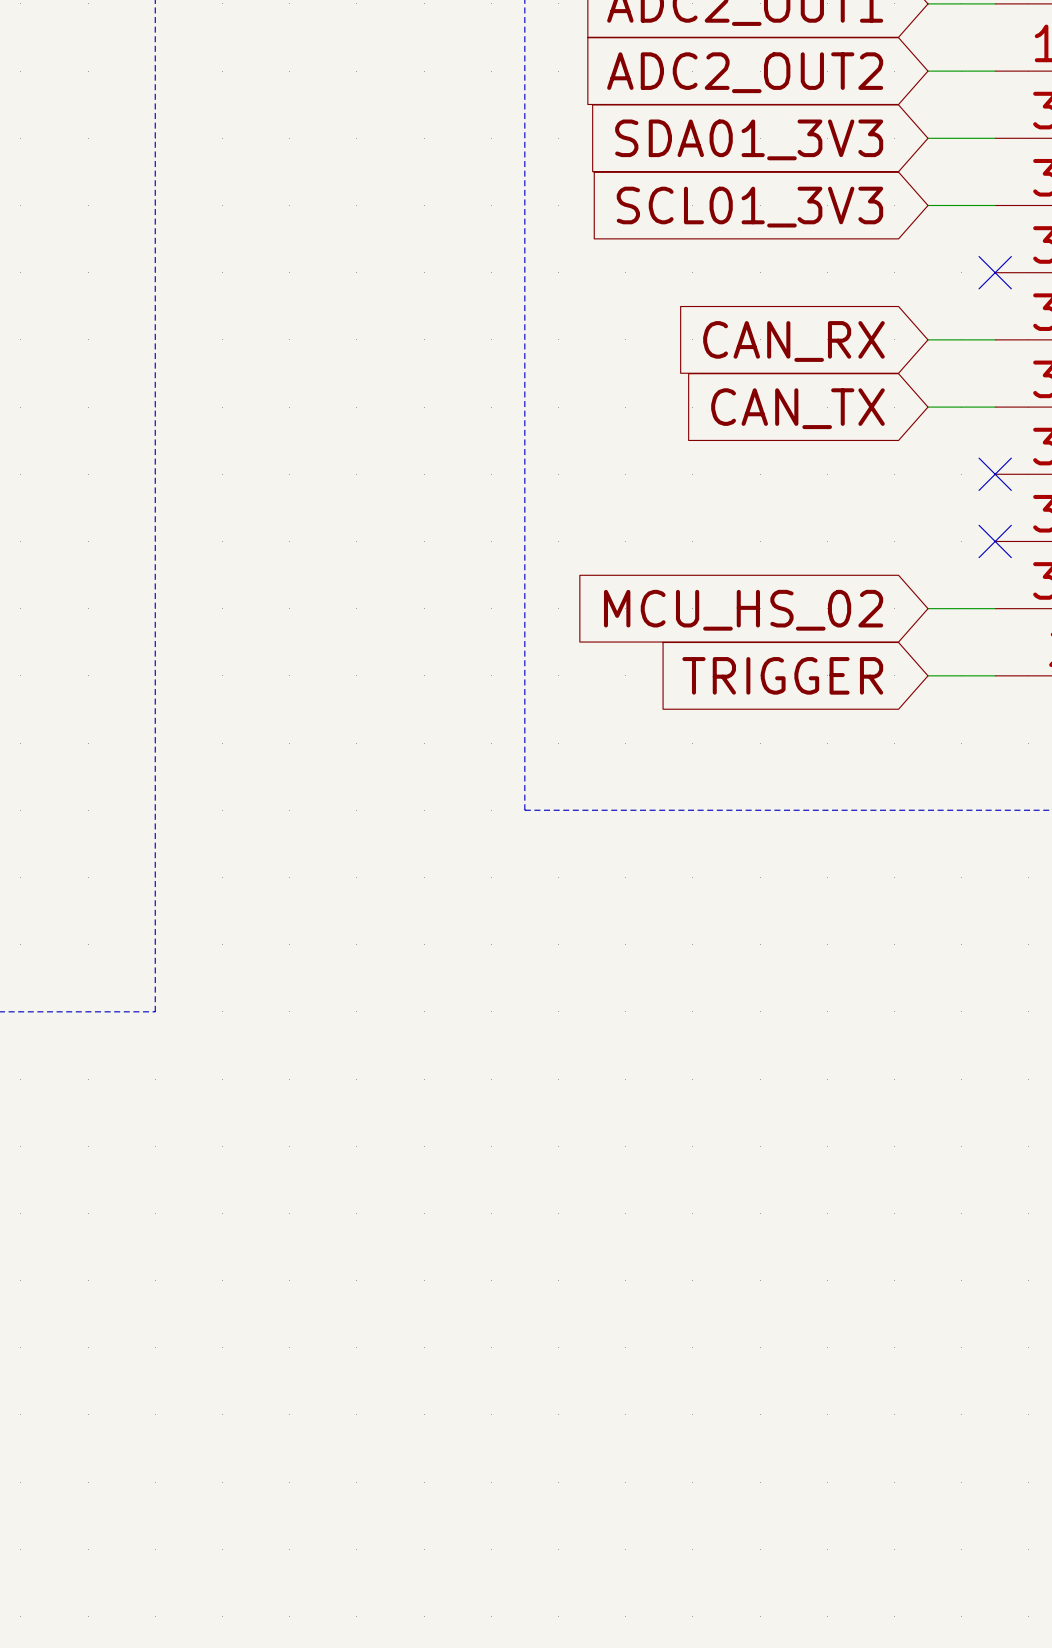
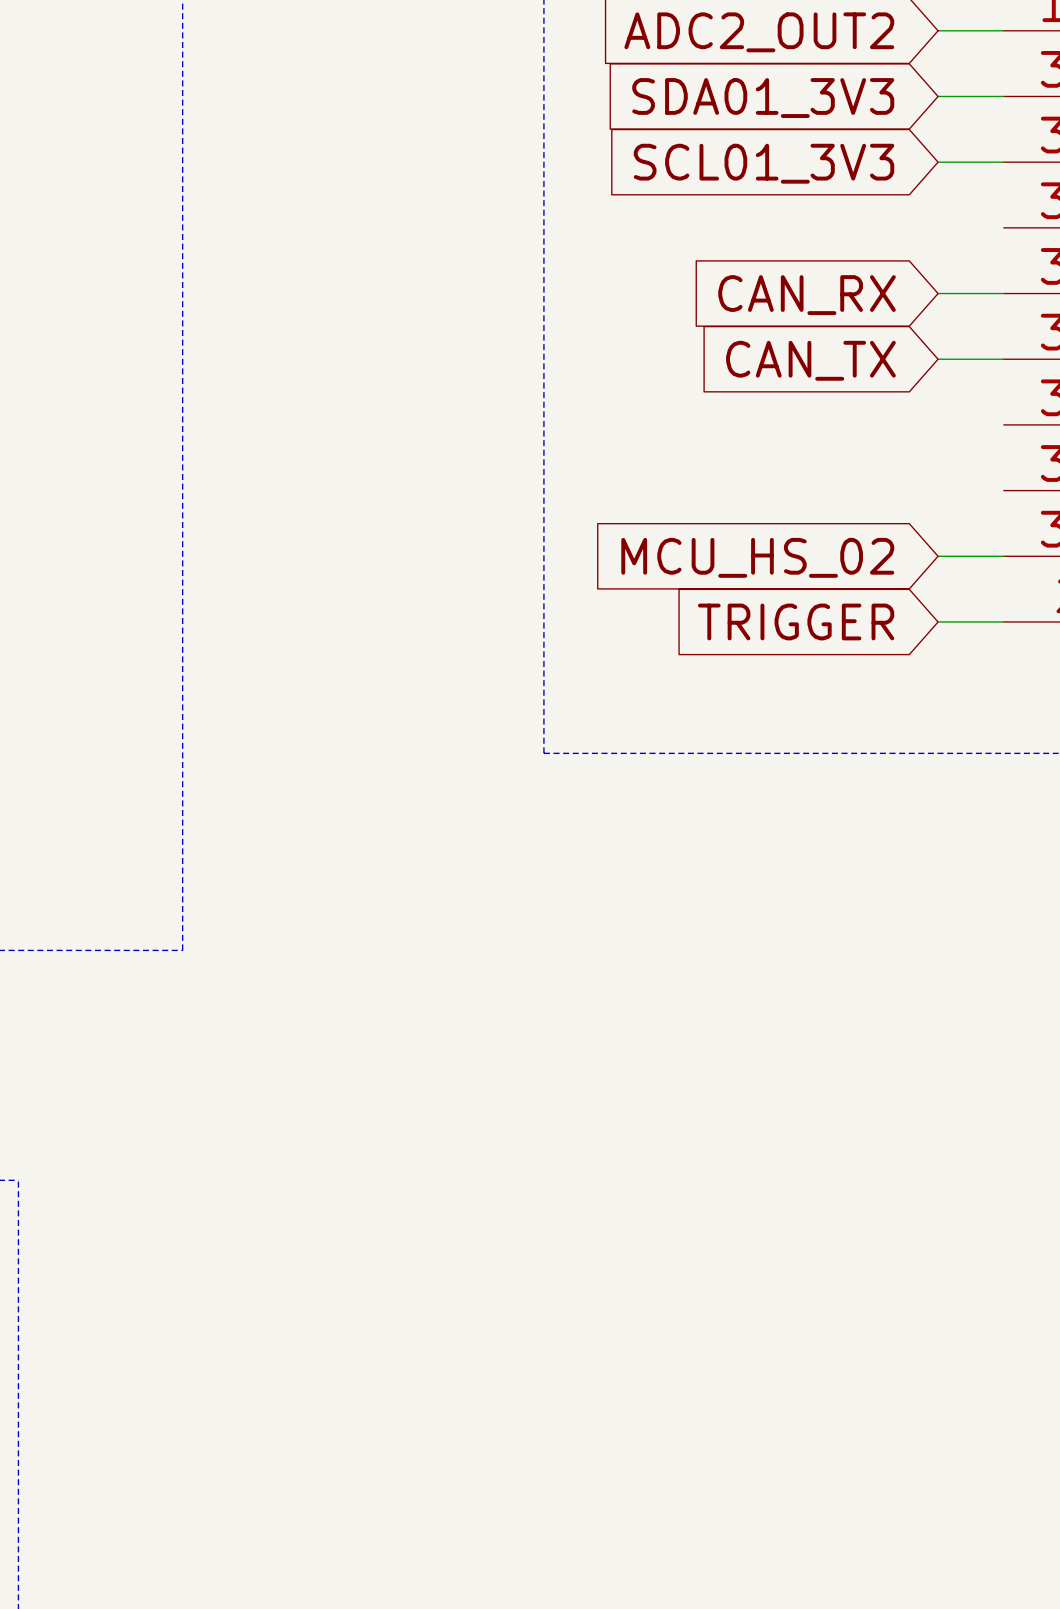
no-connect mark: (995, 272) -> none
no-connect mark: (995, 474) -> none
no-connect mark: (995, 541) -> none

